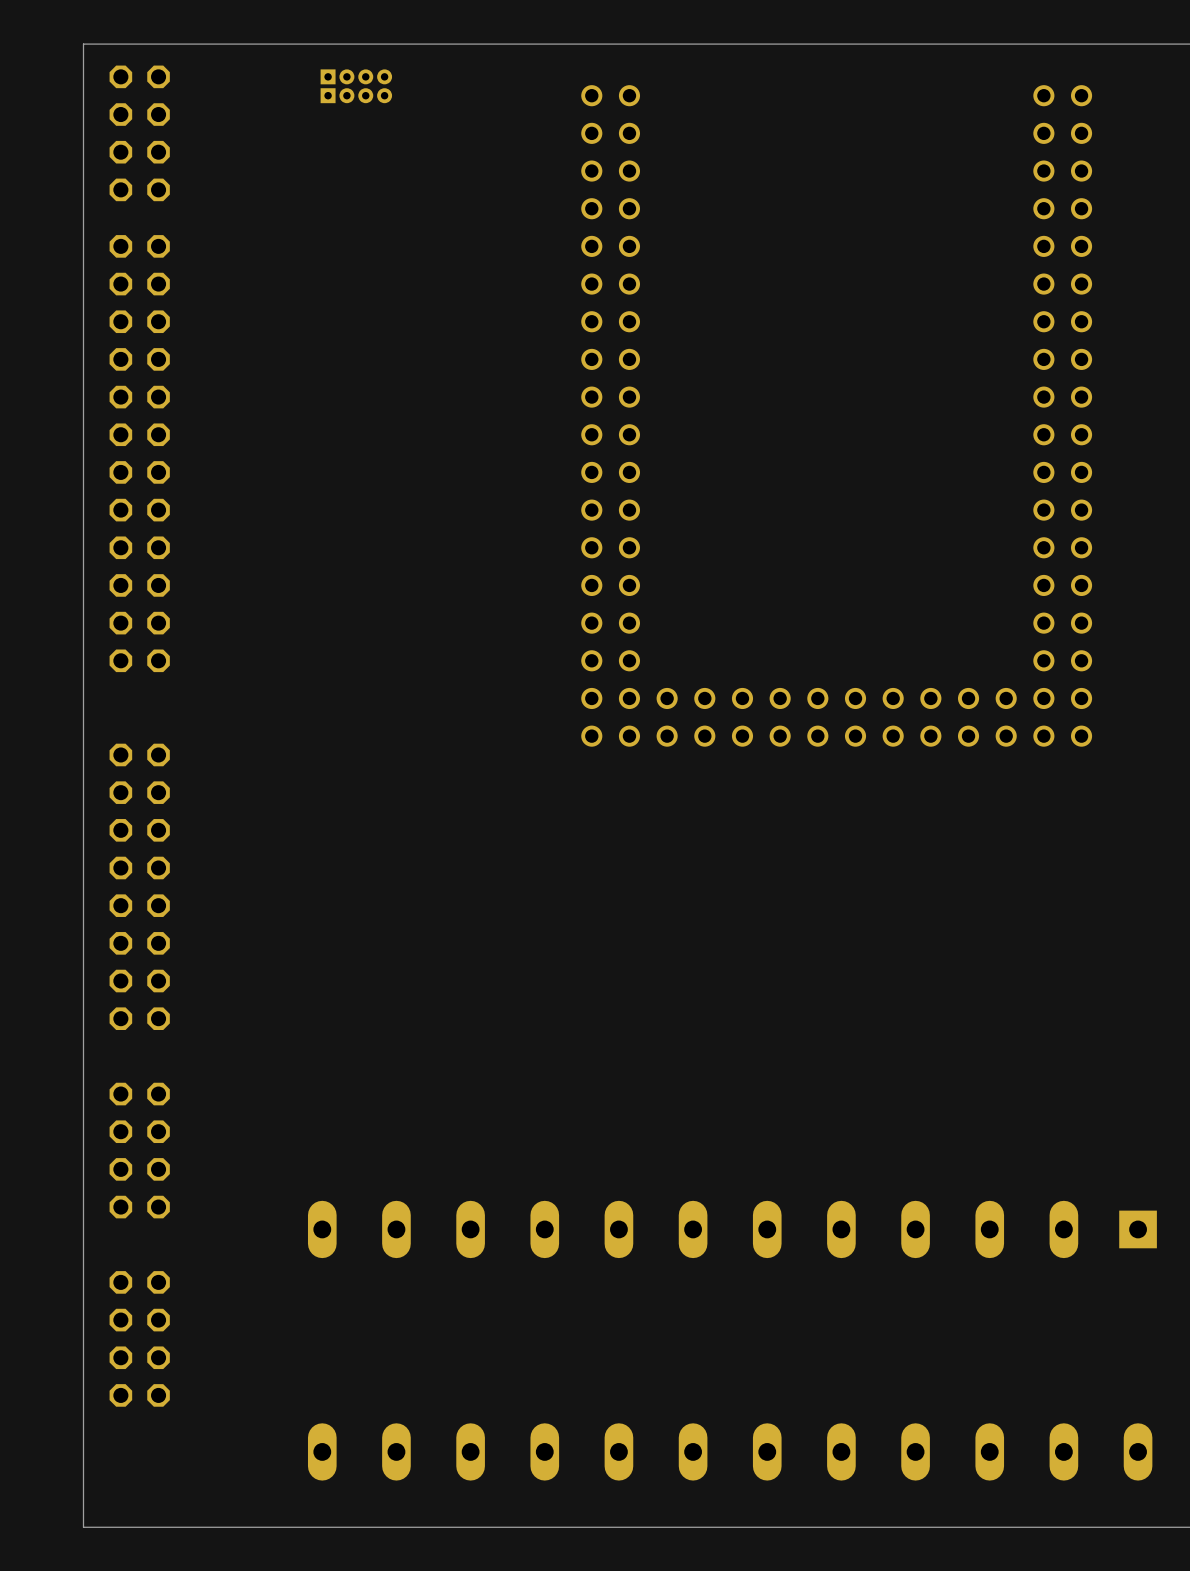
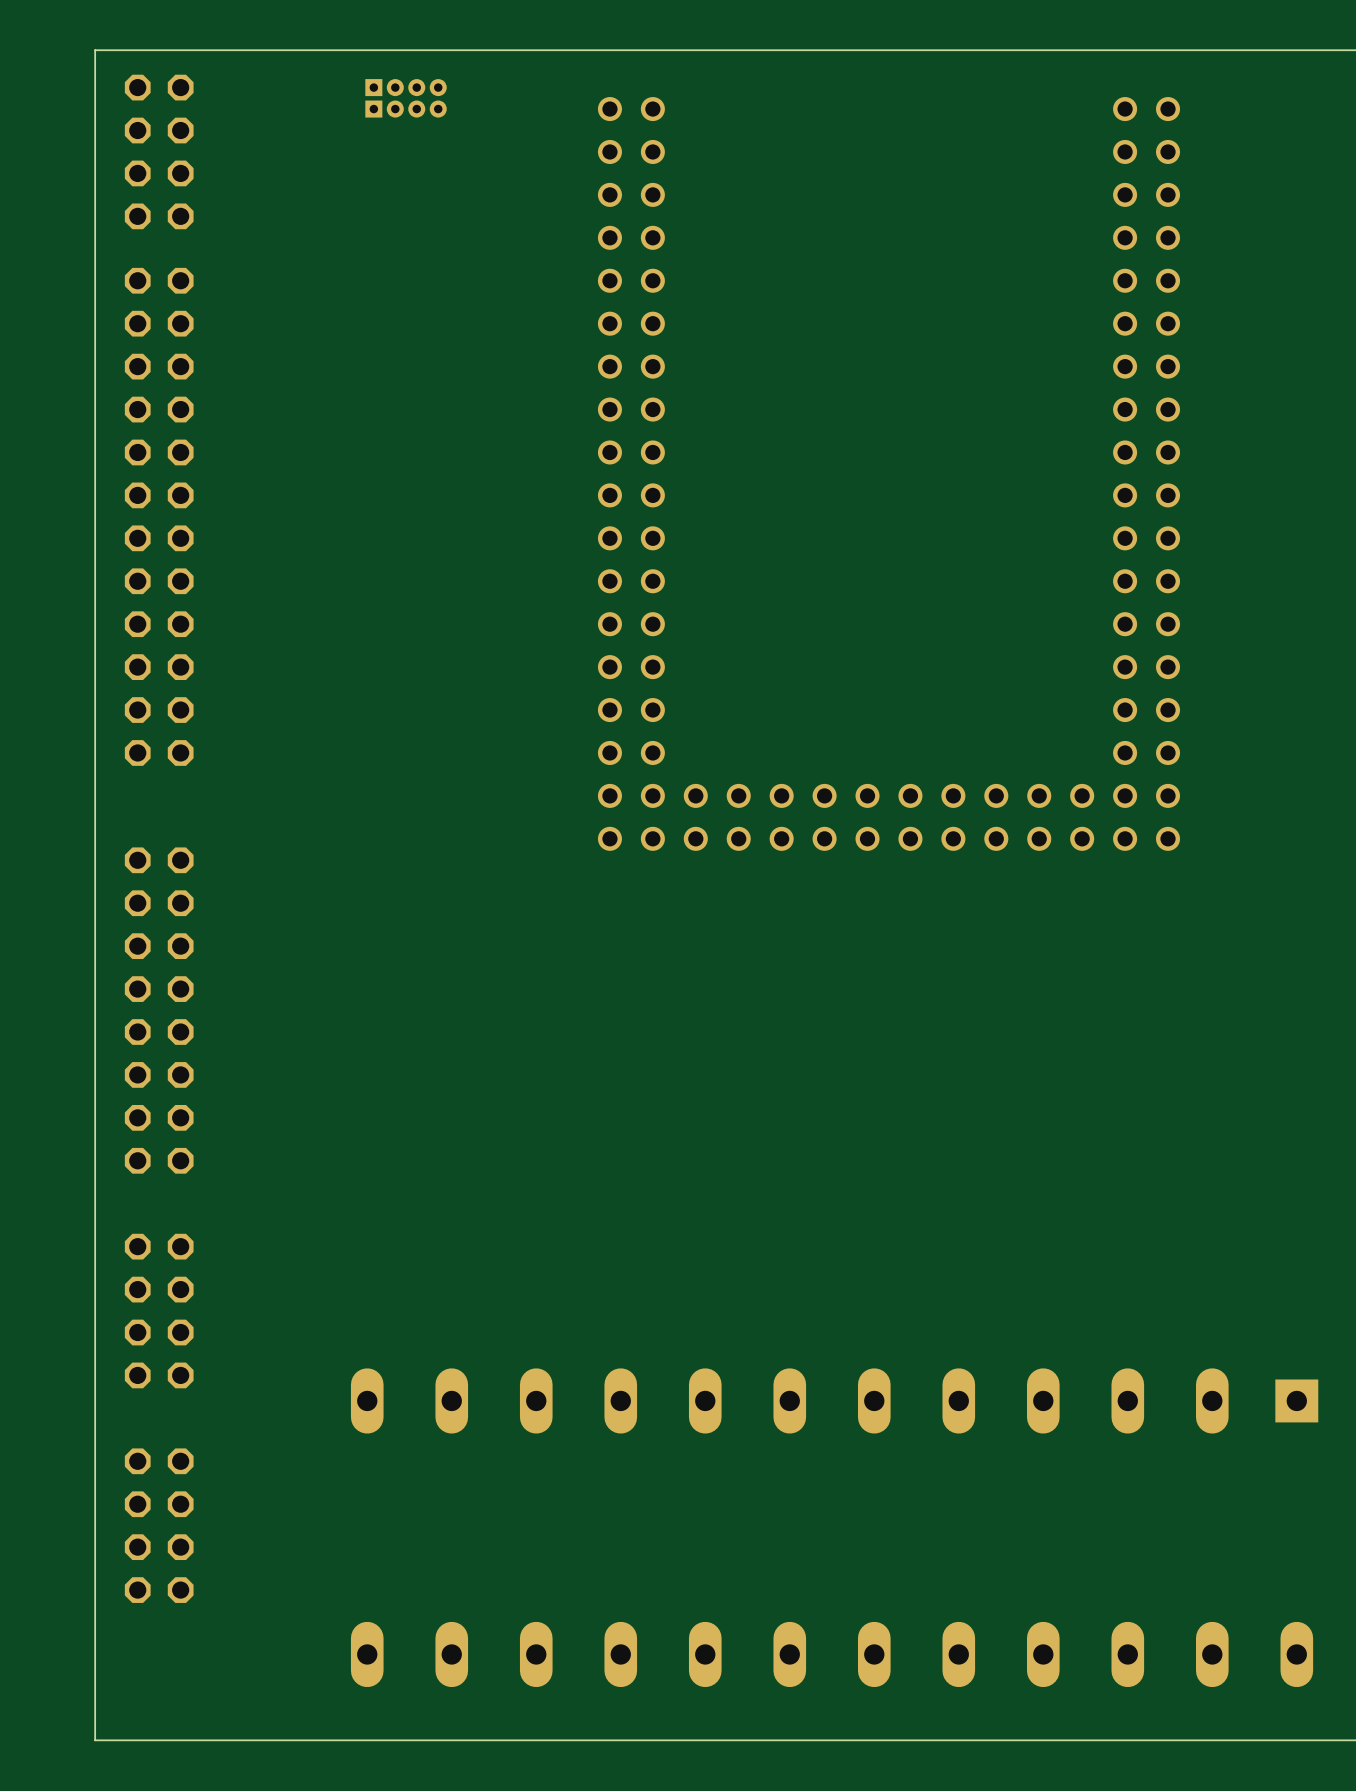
part position: (836, 415) -> (888, 473)

